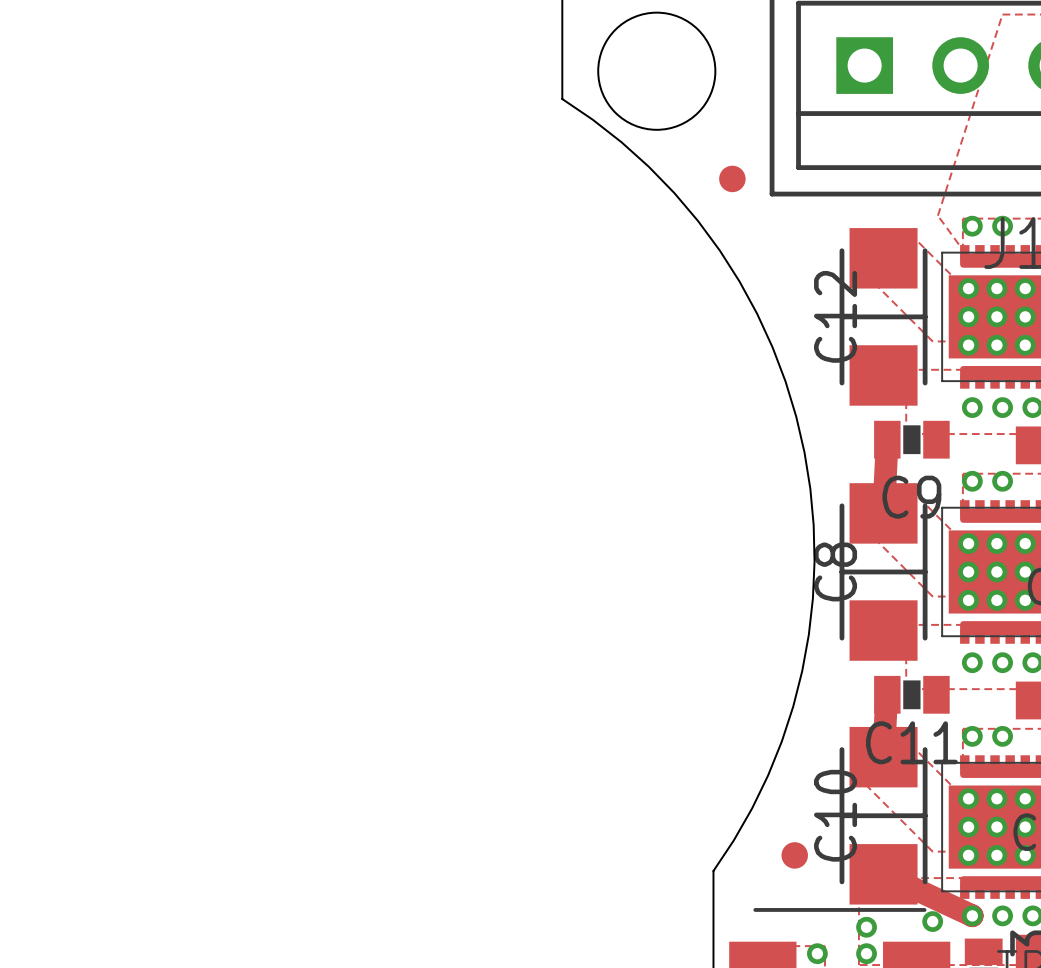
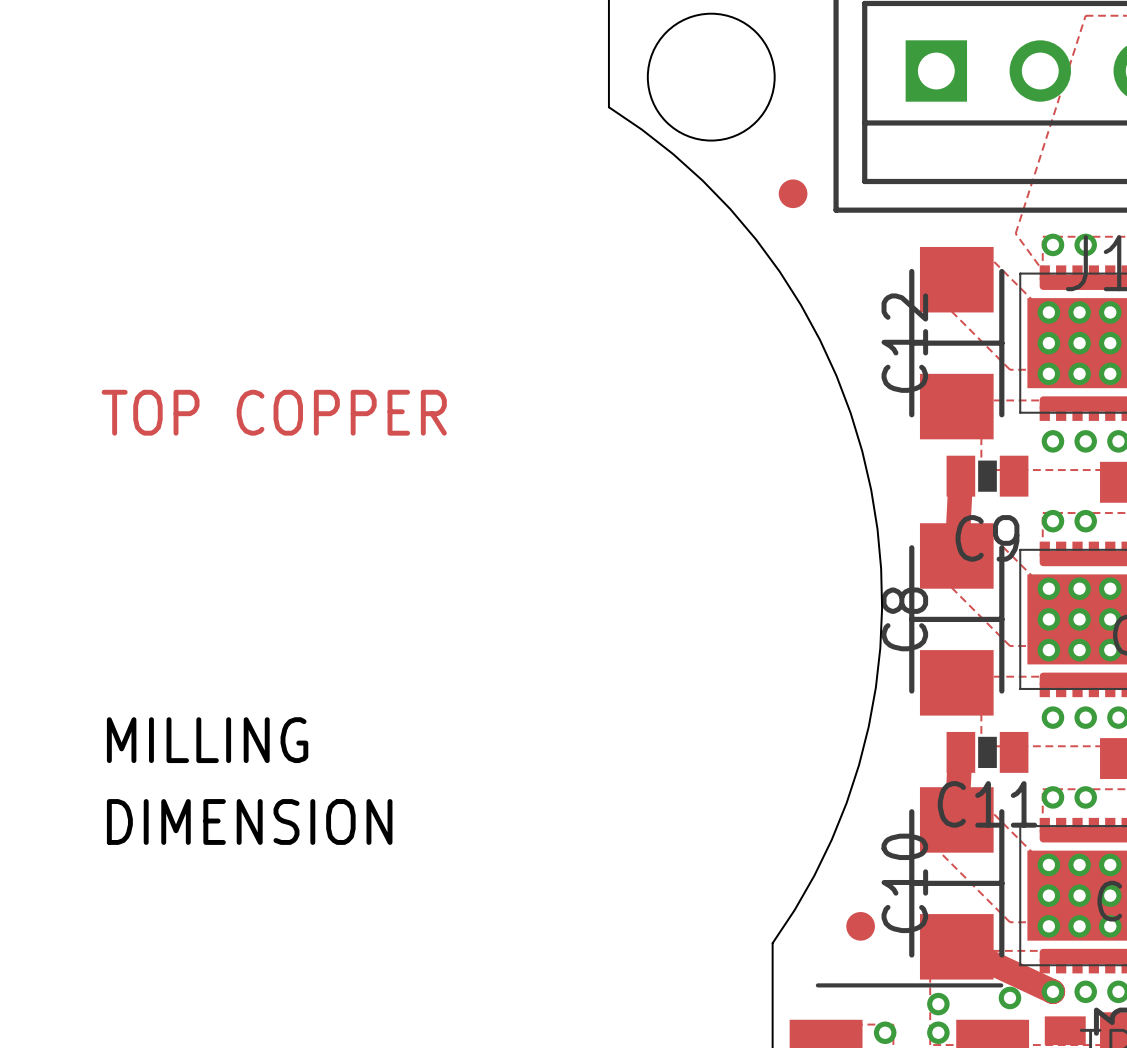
text: none -> TOP COPPER (274, 412)
text: none -> MILLING (207, 740)
text: none -> DIMENSION (249, 821)

